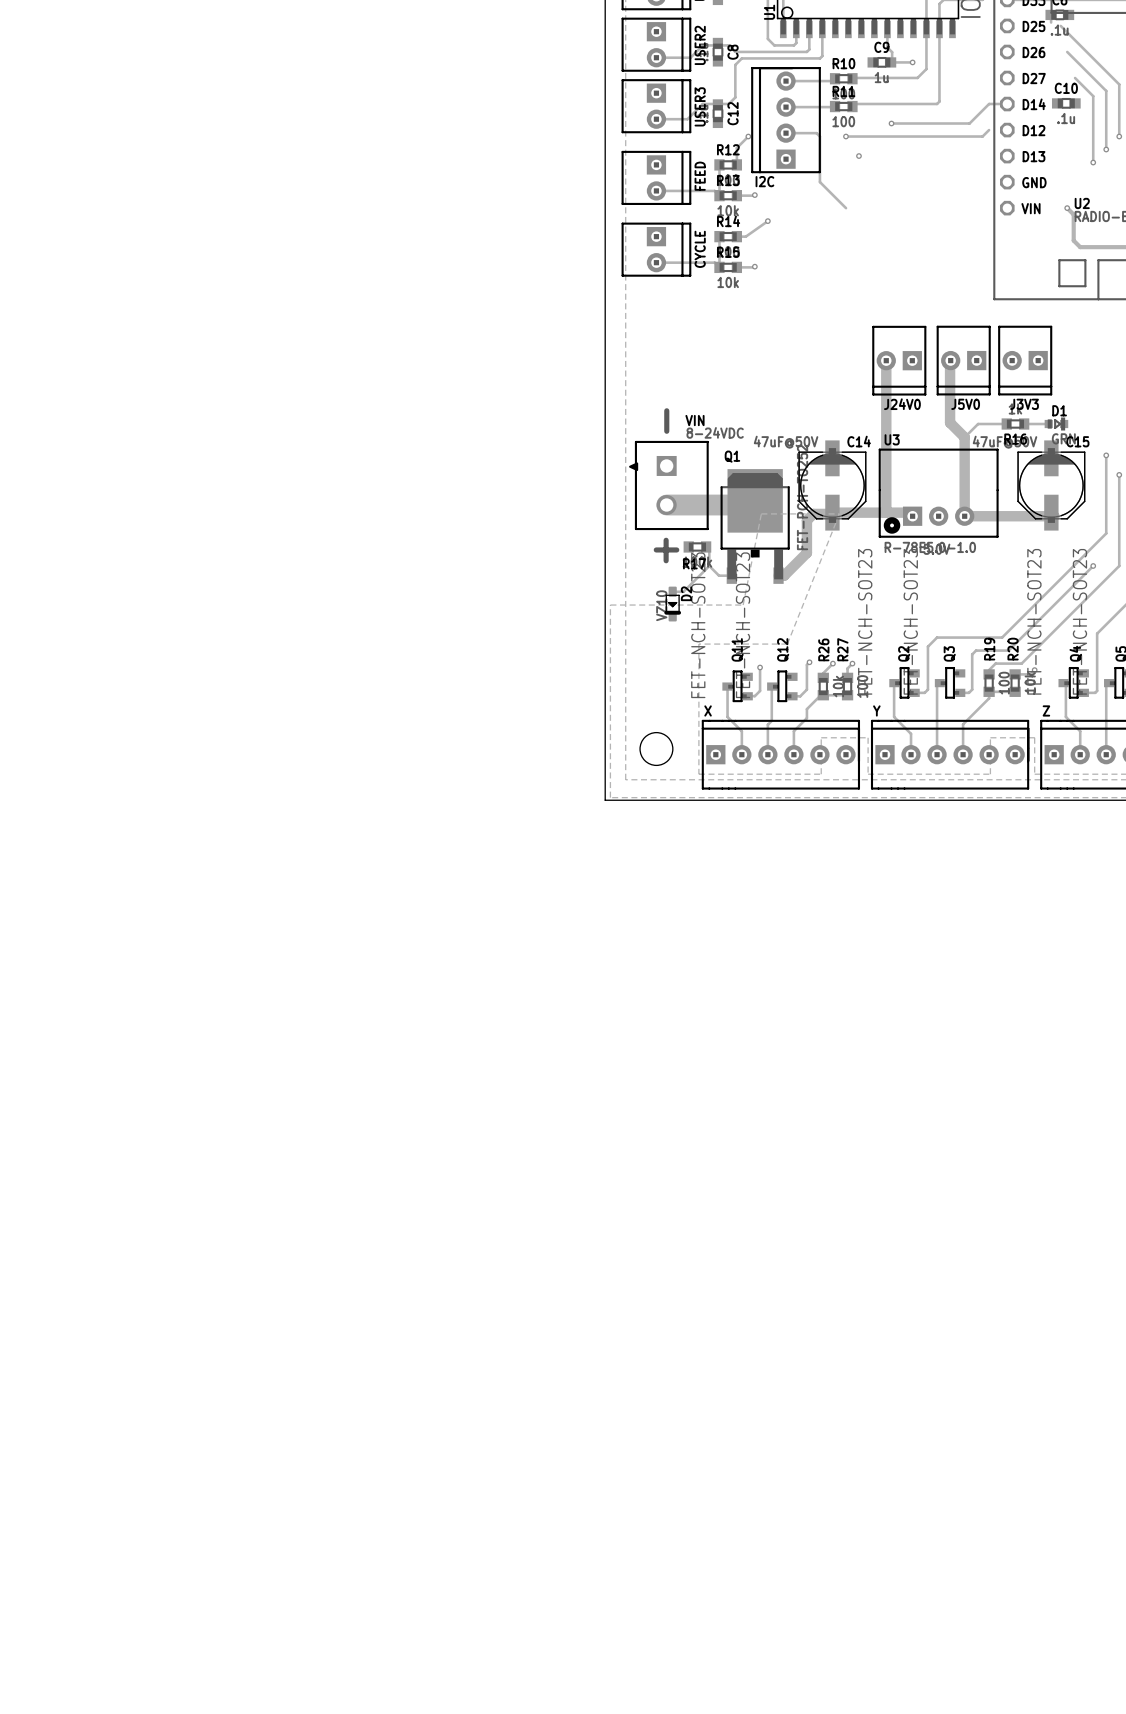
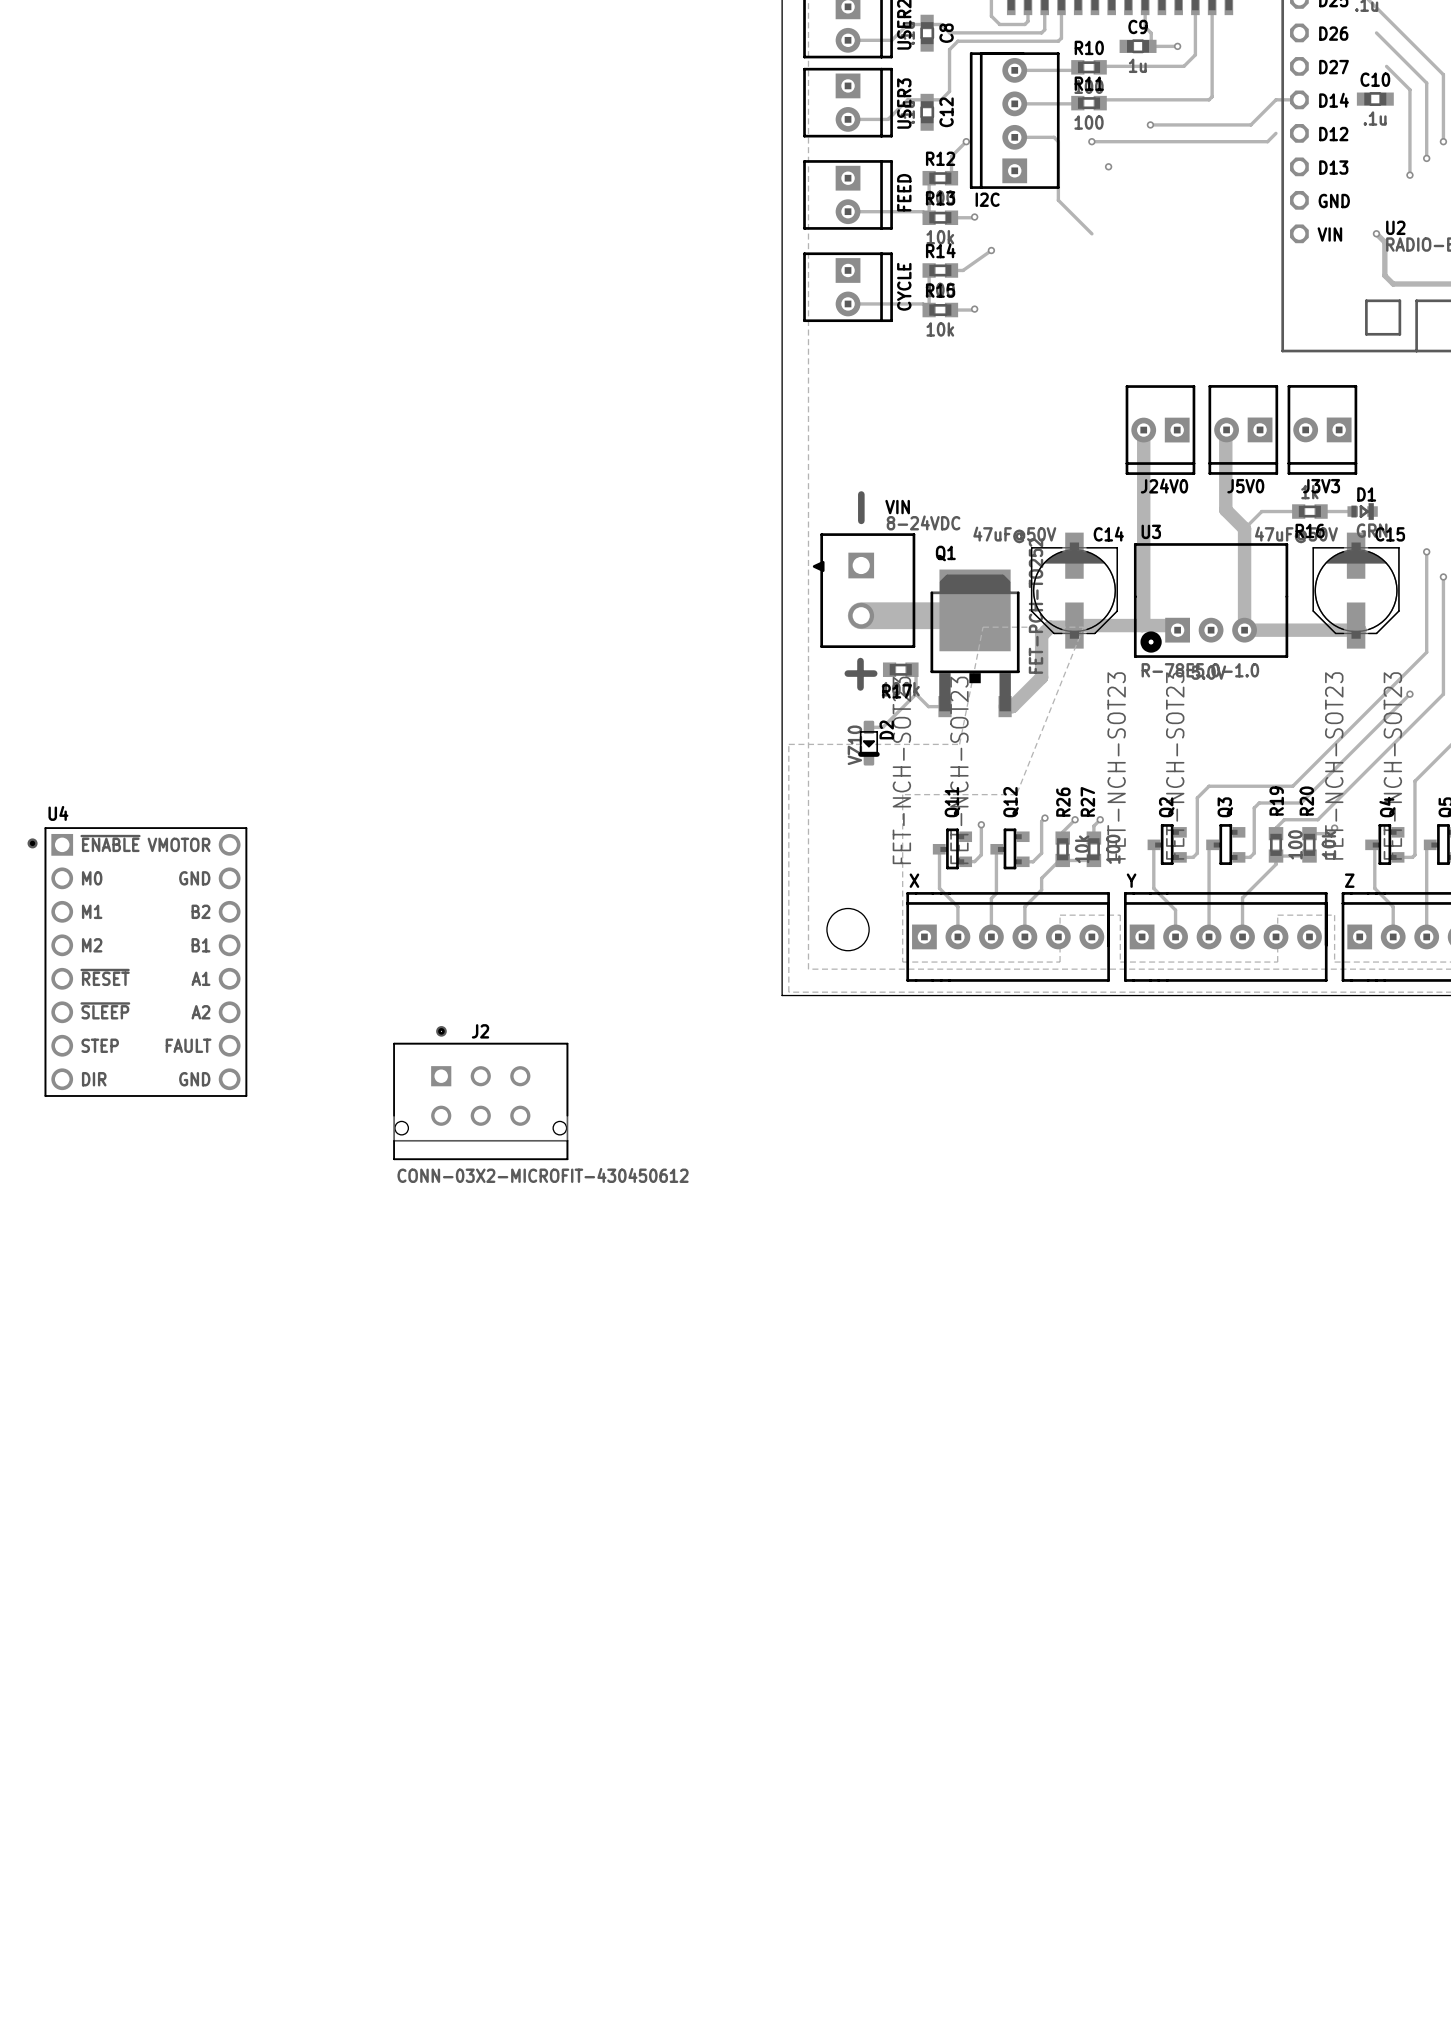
U4: none -> (137, 962)
J2: none -> CONN-03X2-MICROFIT-430450612 (480, 1093)

